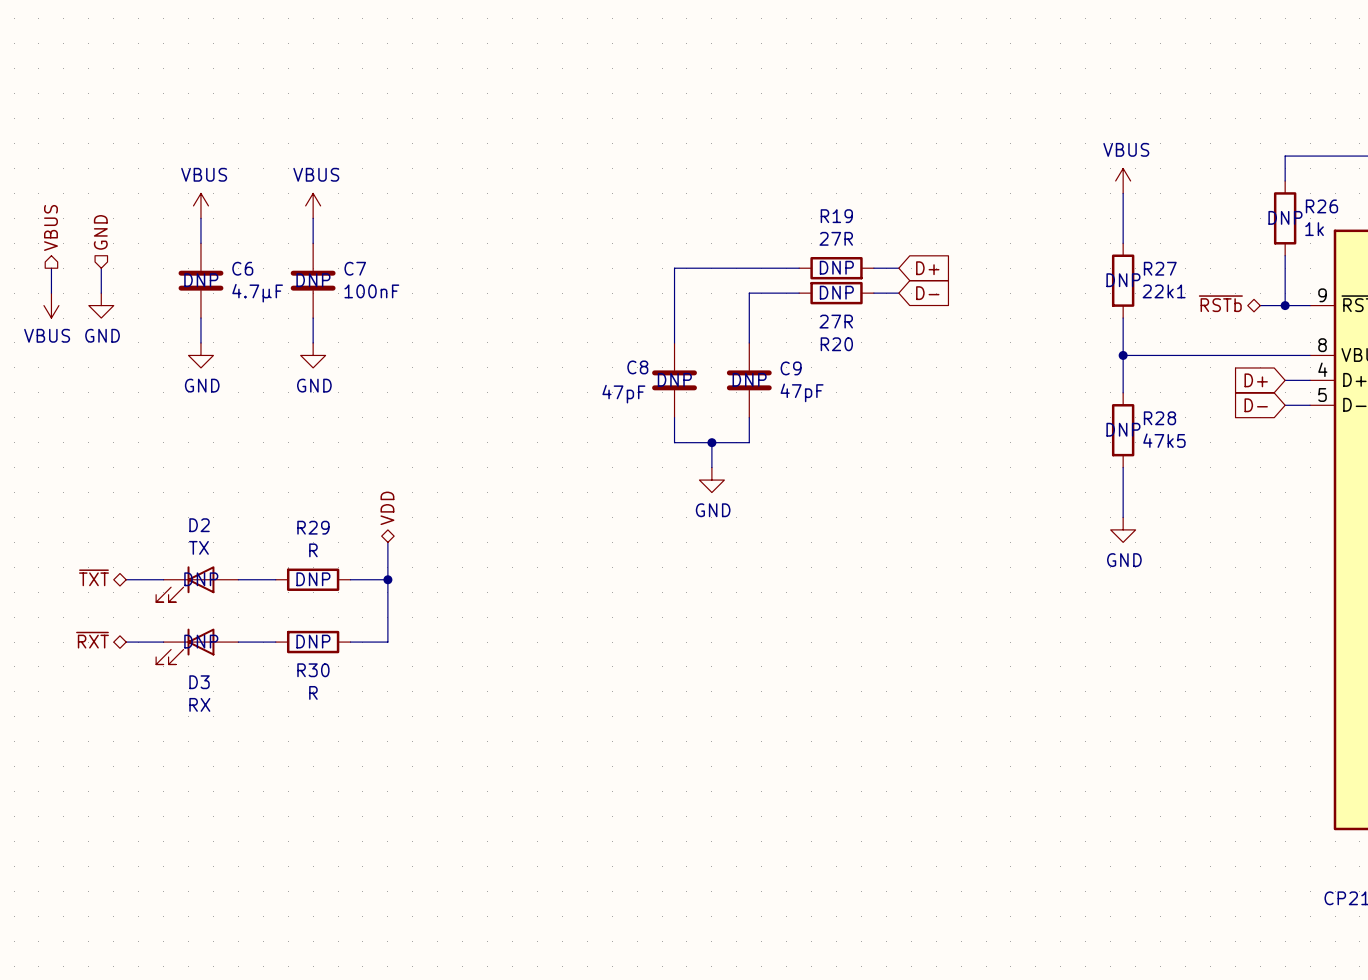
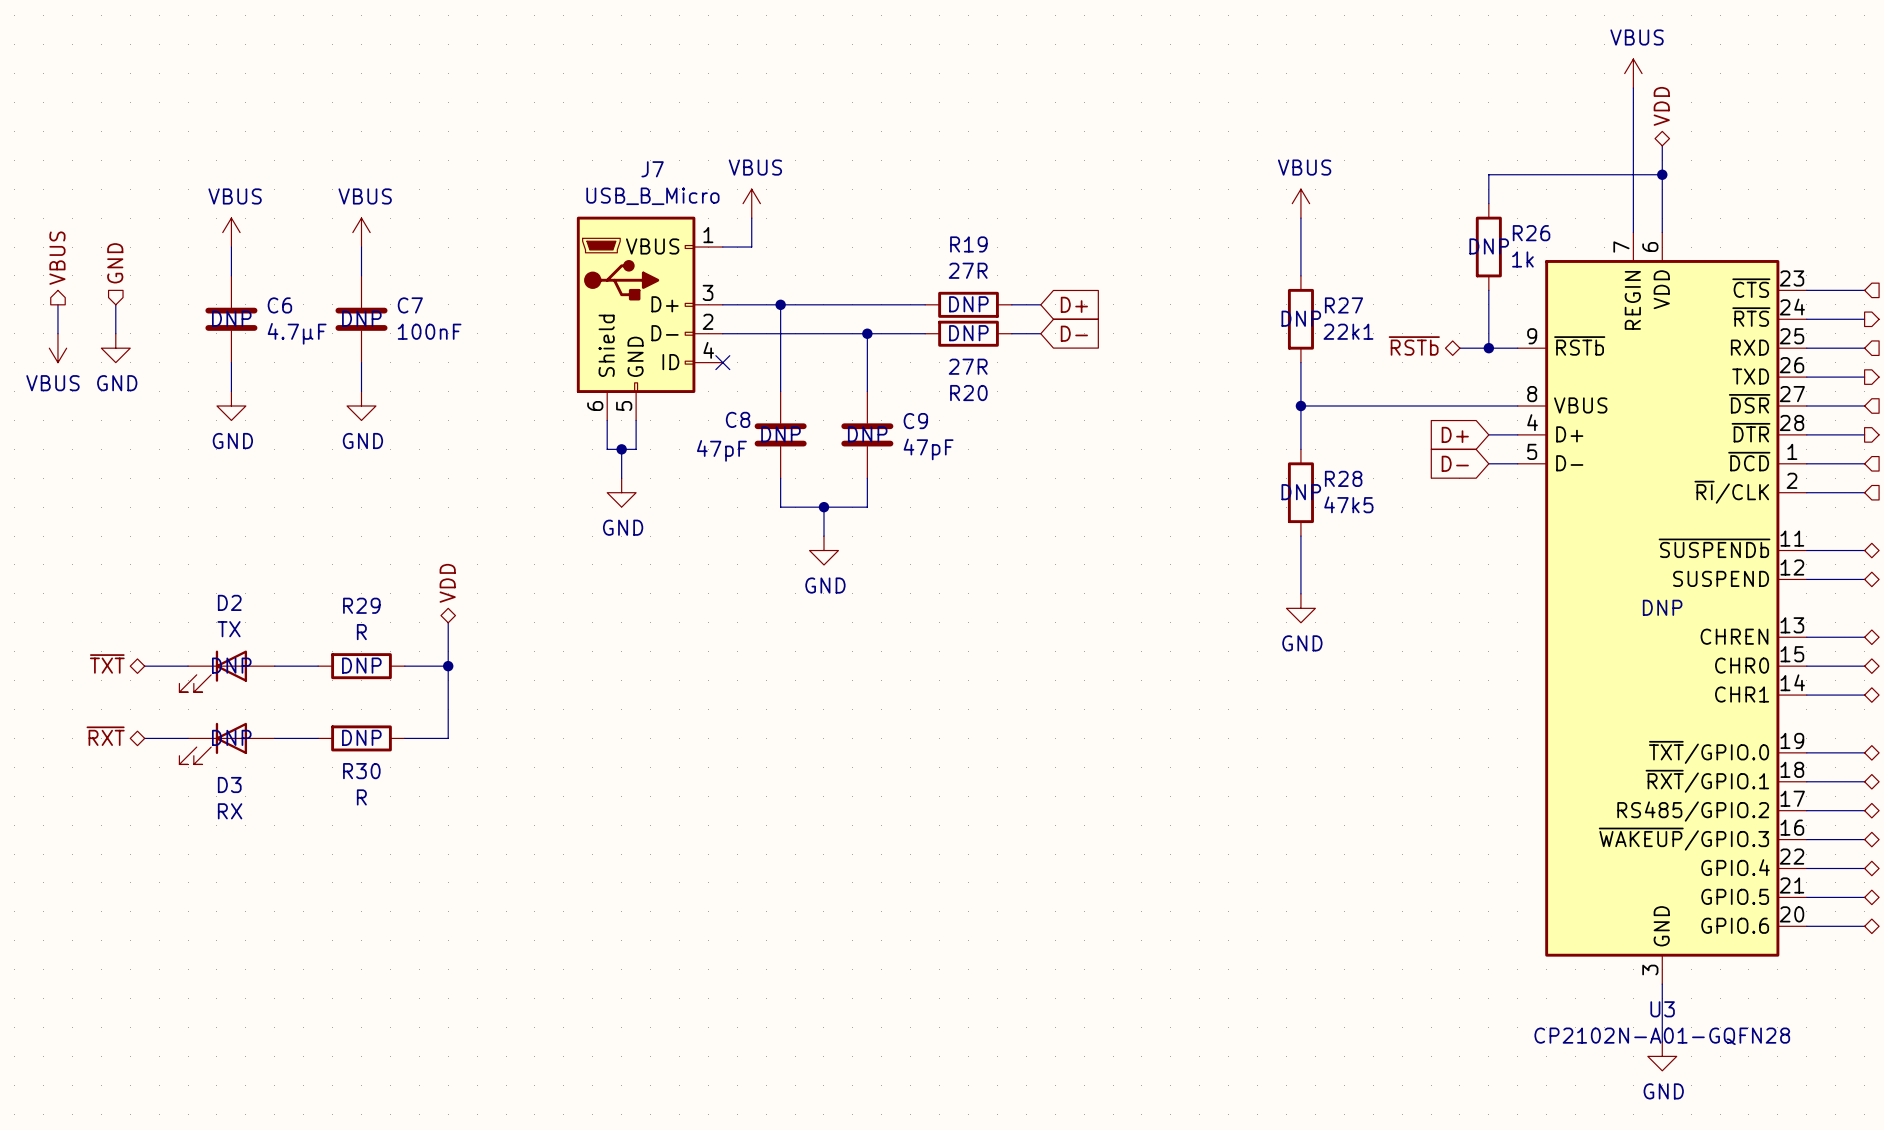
power symbol: none -> VBUS (751, 203)
wire: none -> (751, 218) (751, 247) (722, 247)
wire: none -> (722, 304) (780, 304)
junction: none -> (780, 304)
J7: none -> USB_B_Micro (649, 318)
wire: none -> (722, 333) (867, 333)
junction: none -> (867, 333)
no-connect mark: none -> (722, 362)
wire: none -> (607, 420) (607, 449) (636, 449) (636, 420)
wire: none -> (621, 449) (621, 478)
junction: none -> (621, 449)
power symbol: none -> GND (621, 492)

